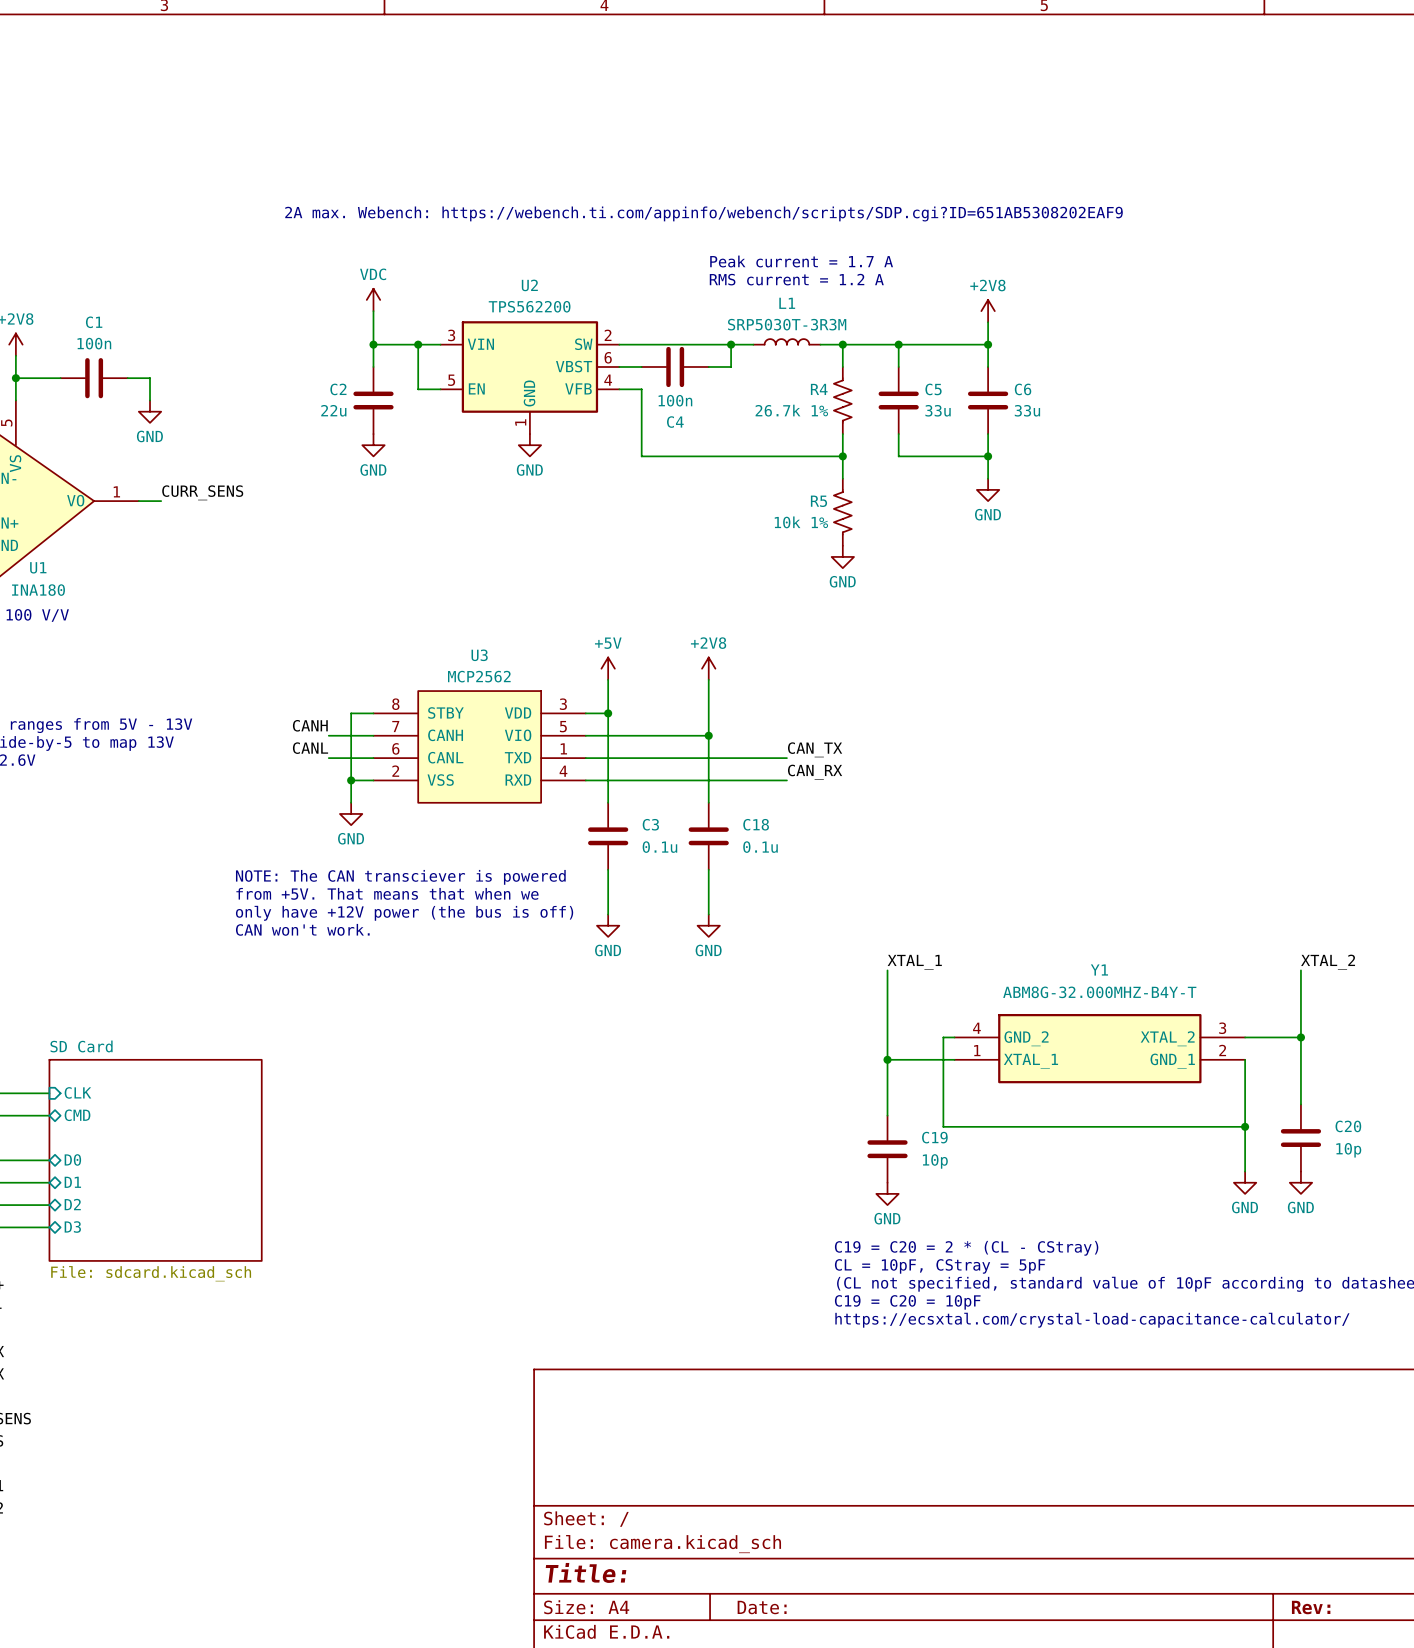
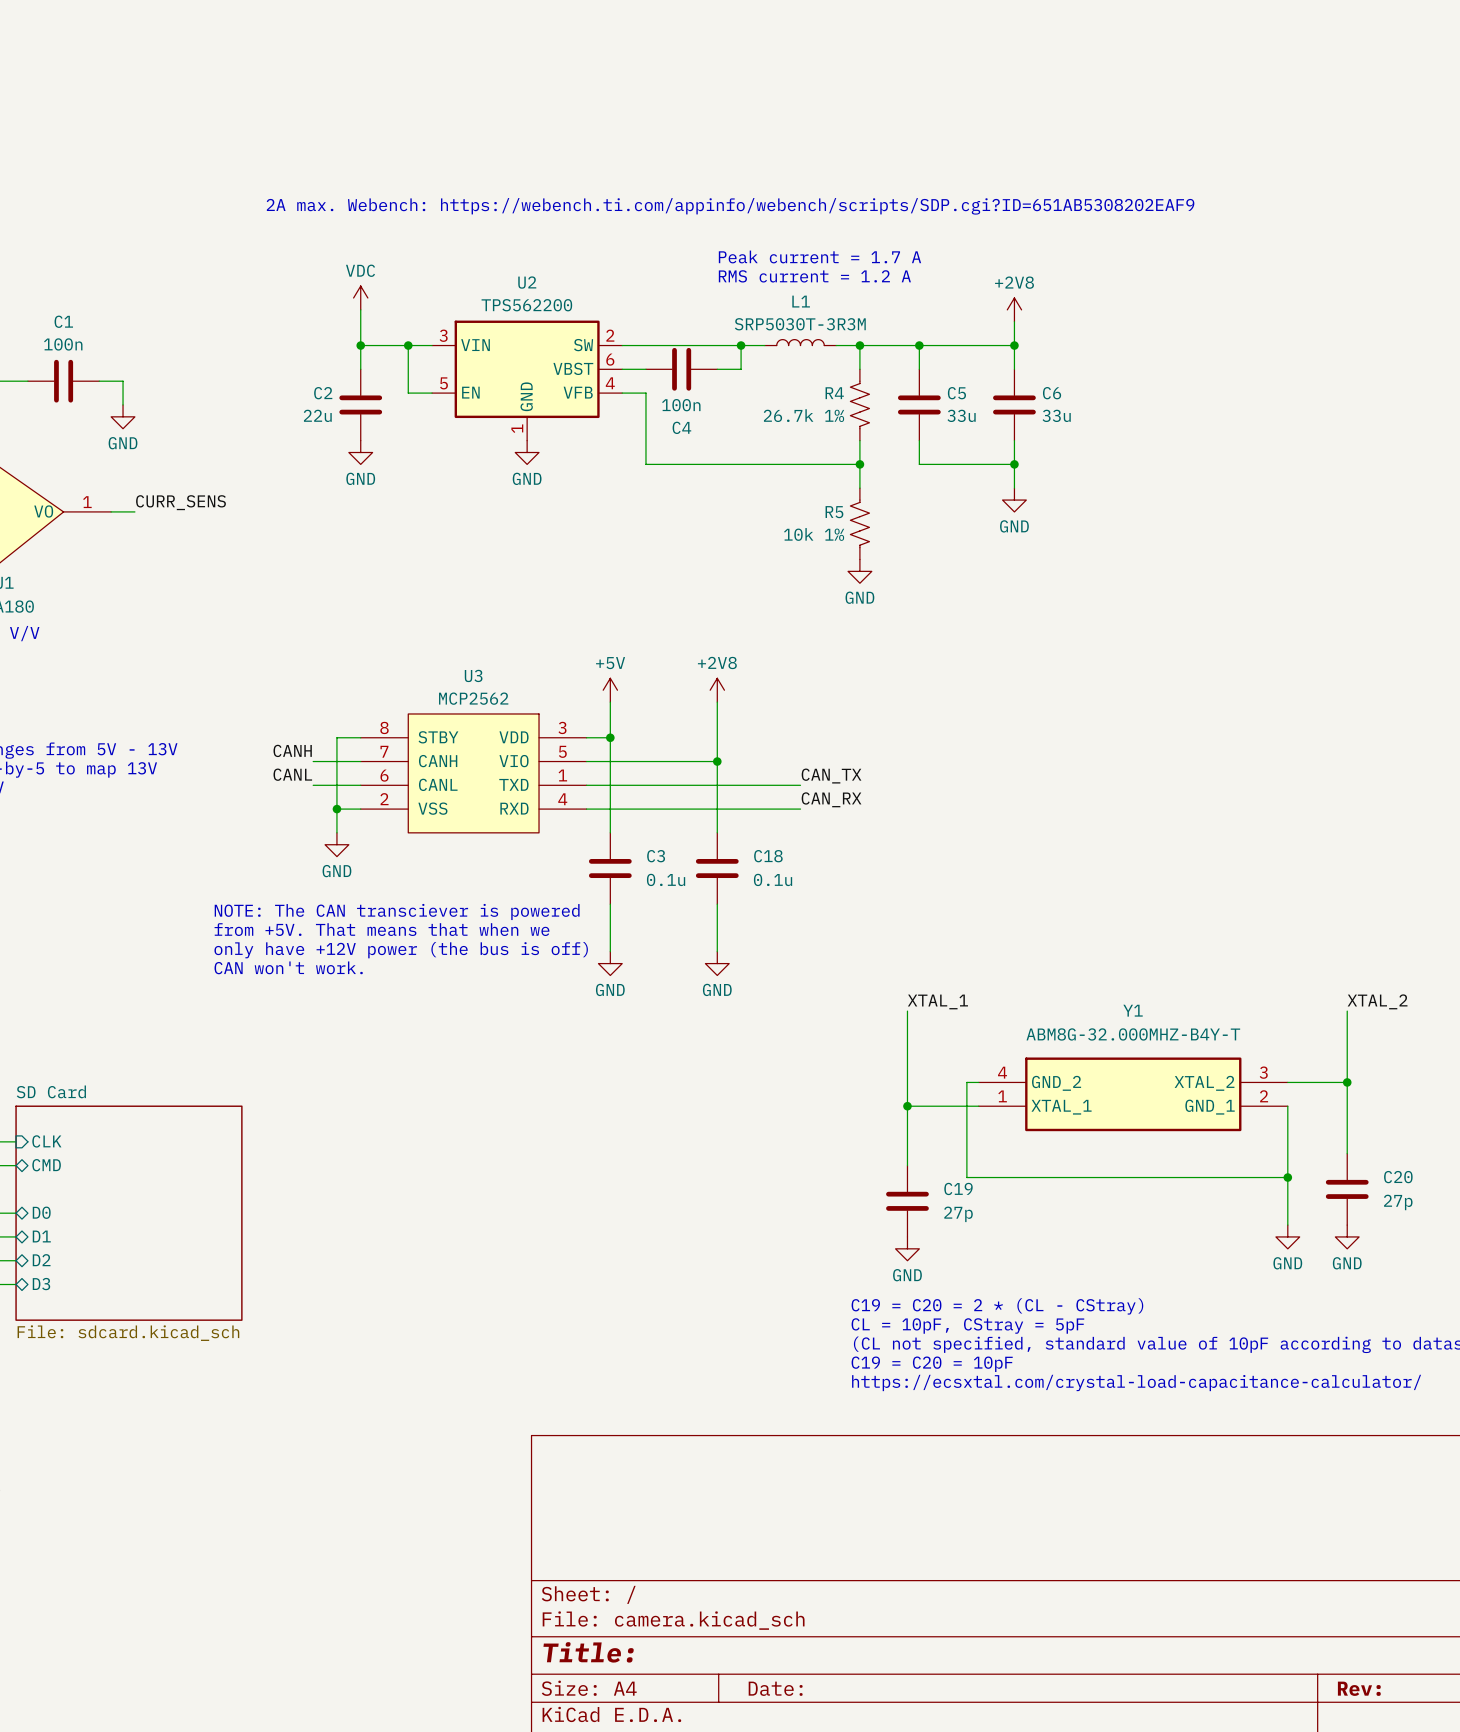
C20 value: 10p (1348, 1150) -> 27p (1398, 1202)
C19 value: 10p (935, 1161) -> 27p (958, 1214)

